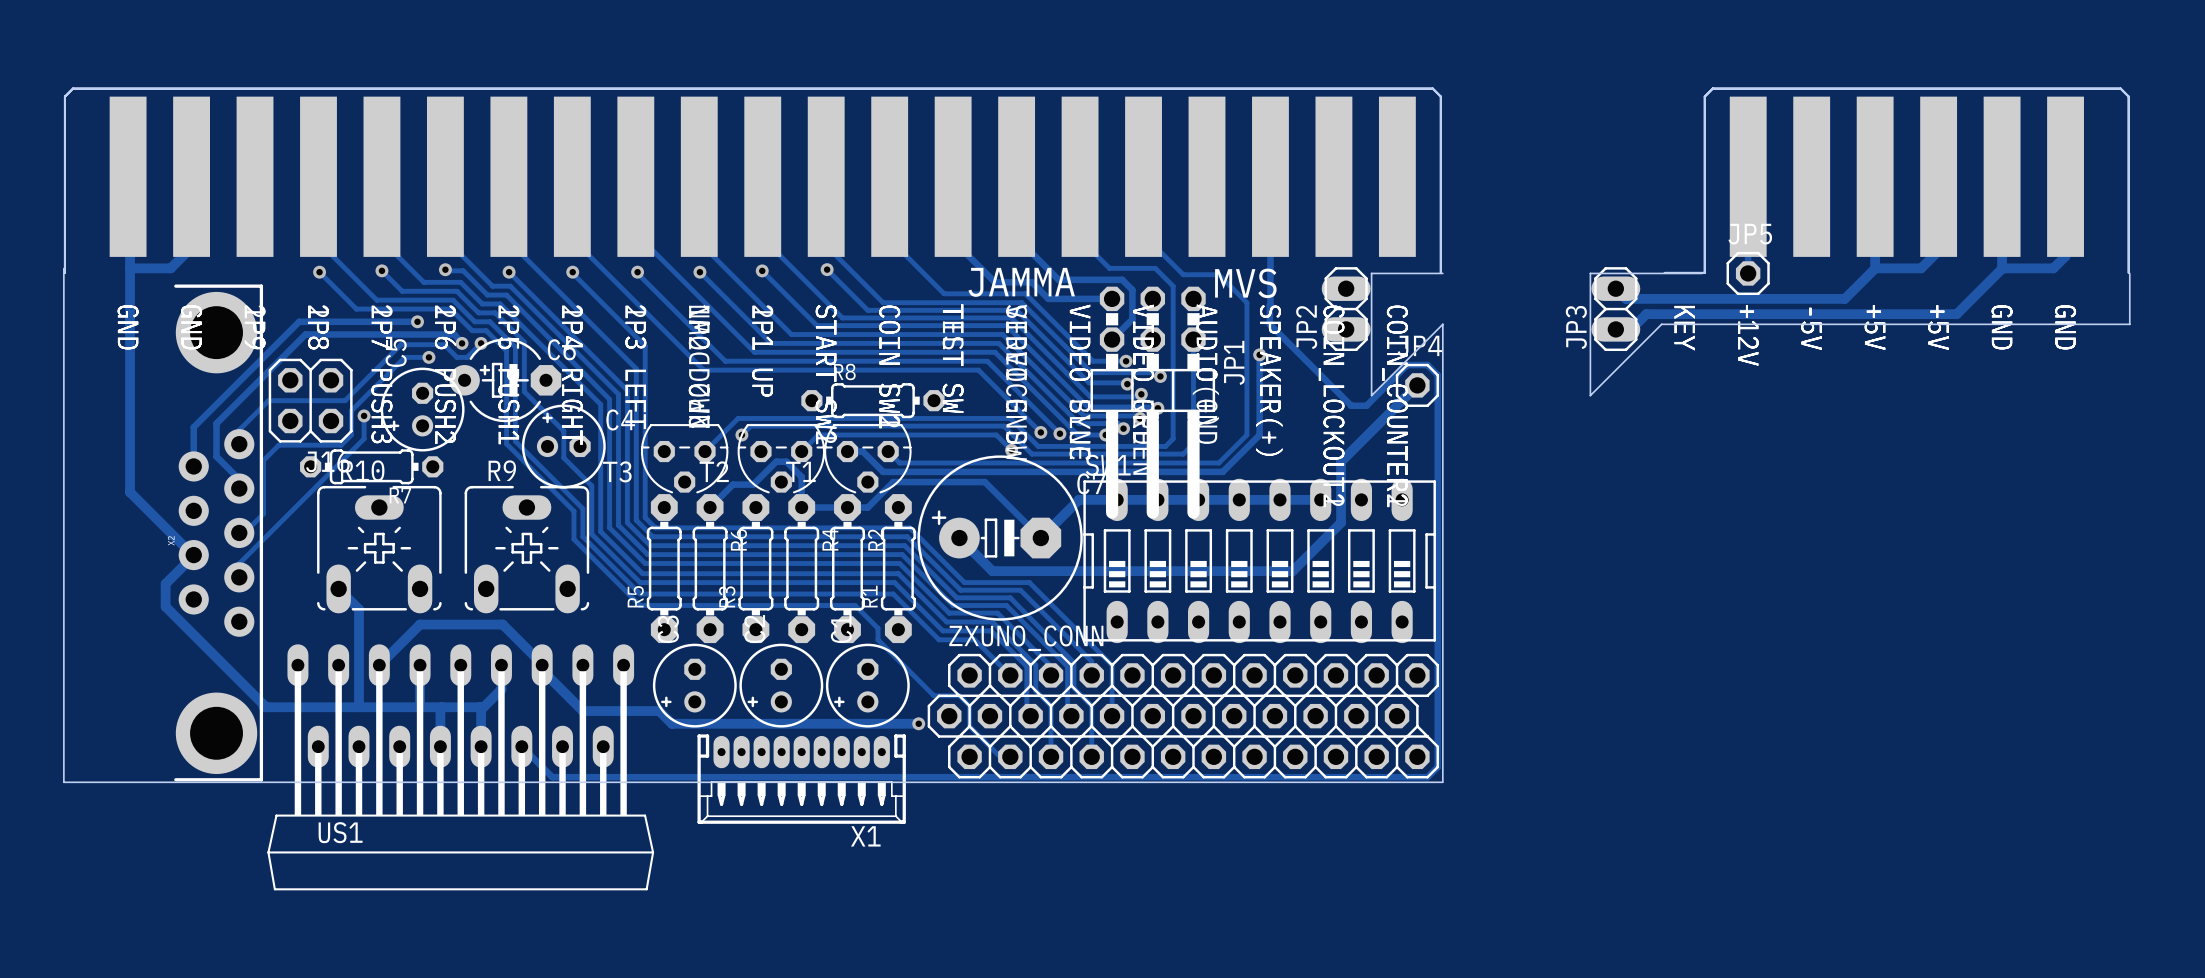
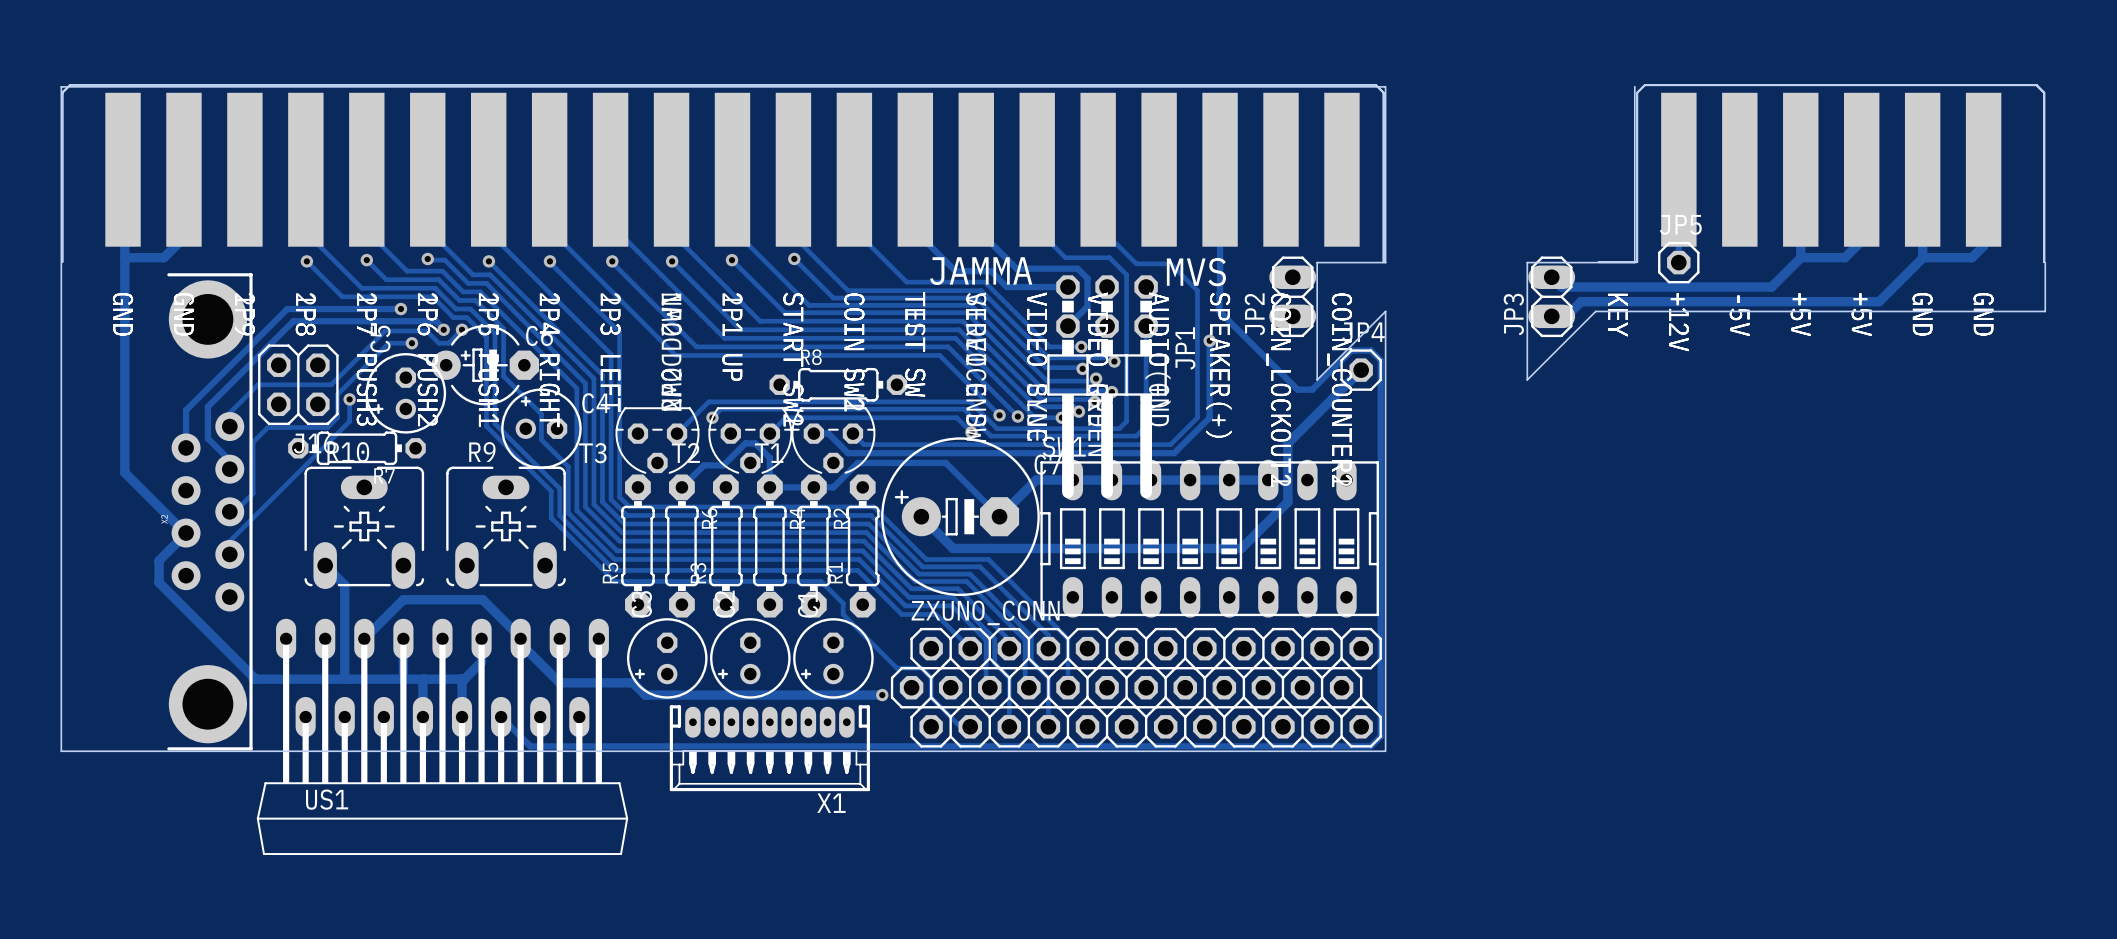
board edge: none -> (1385, 86) (1385, 262)
board edge: none -> (1385, 86) (61, 86) (61, 257)
board edge: none -> (1634, 86) (1634, 262)

